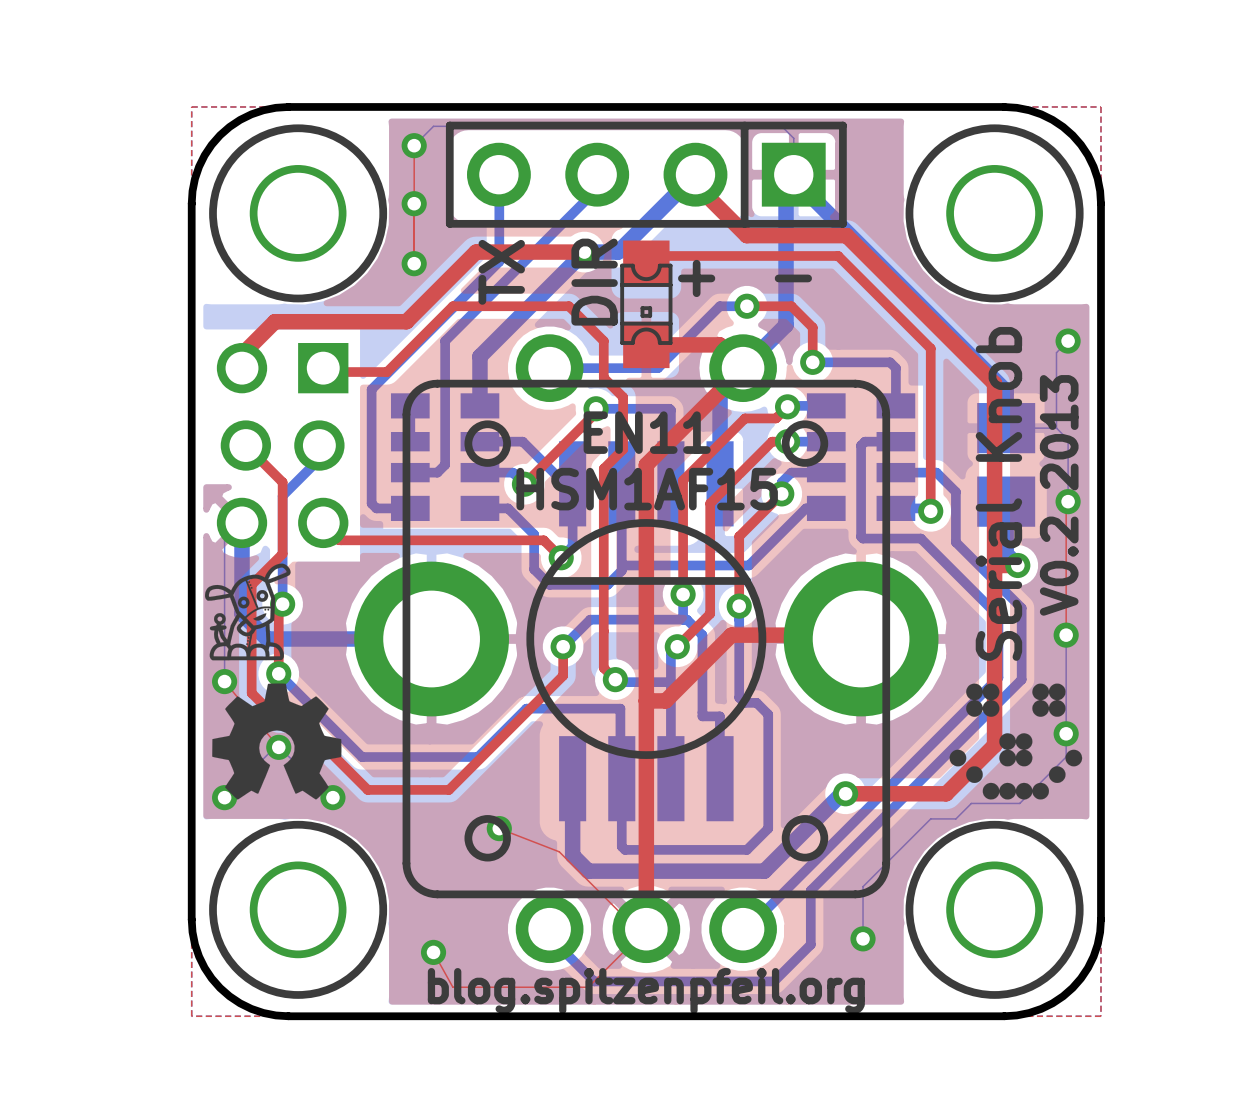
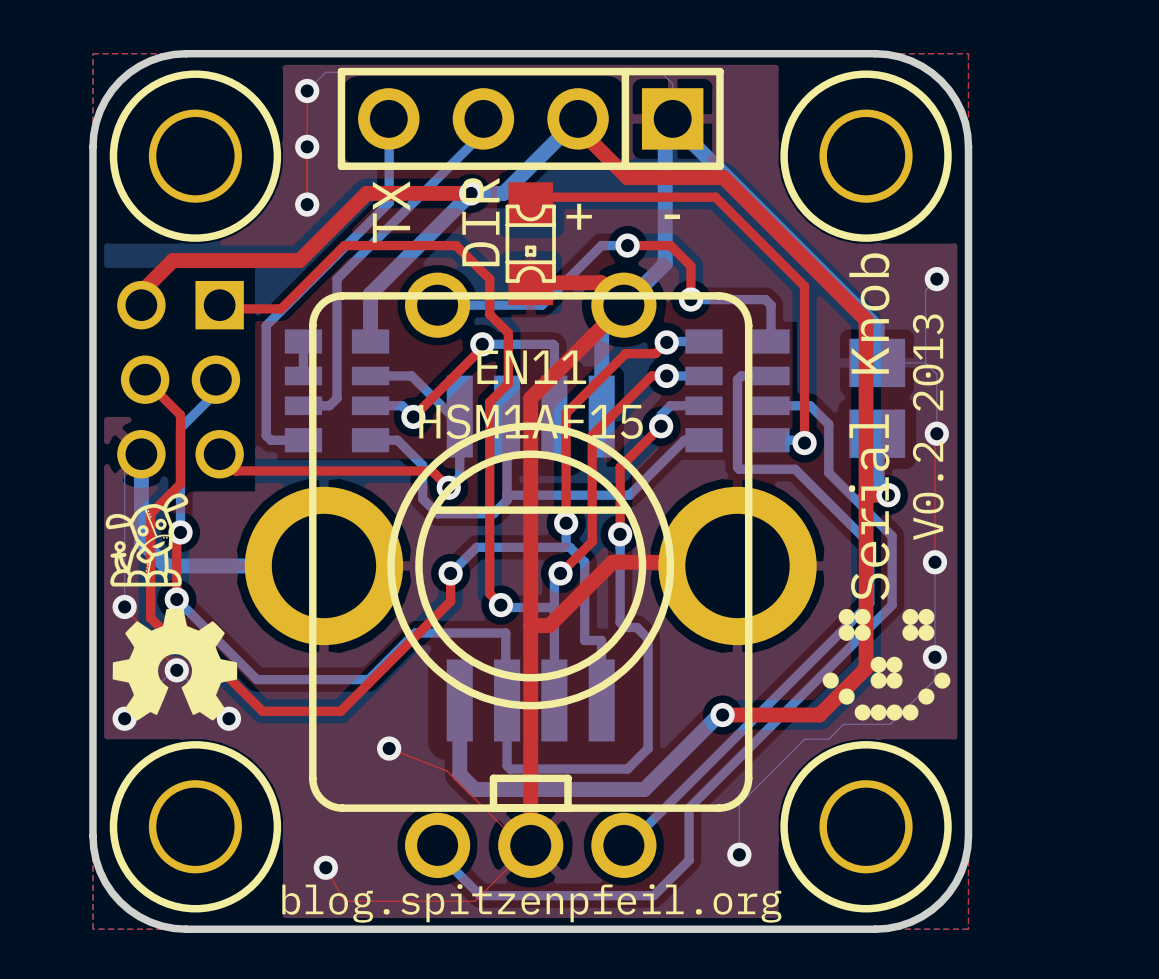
part footprint: [354, 334, 939, 964] -> [244, 272, 817, 879]

